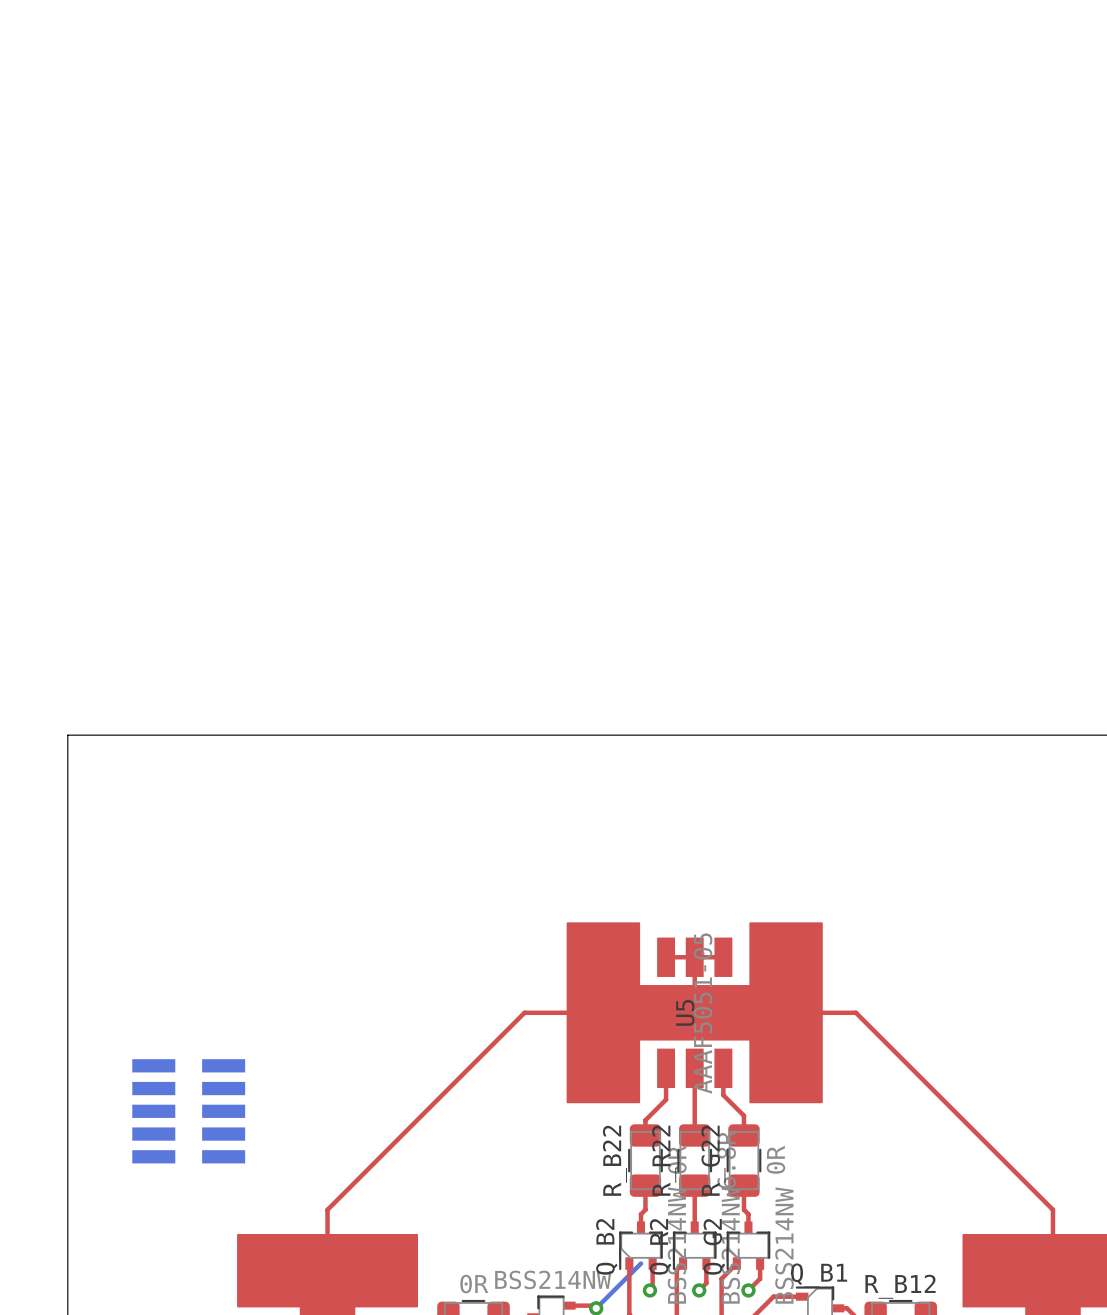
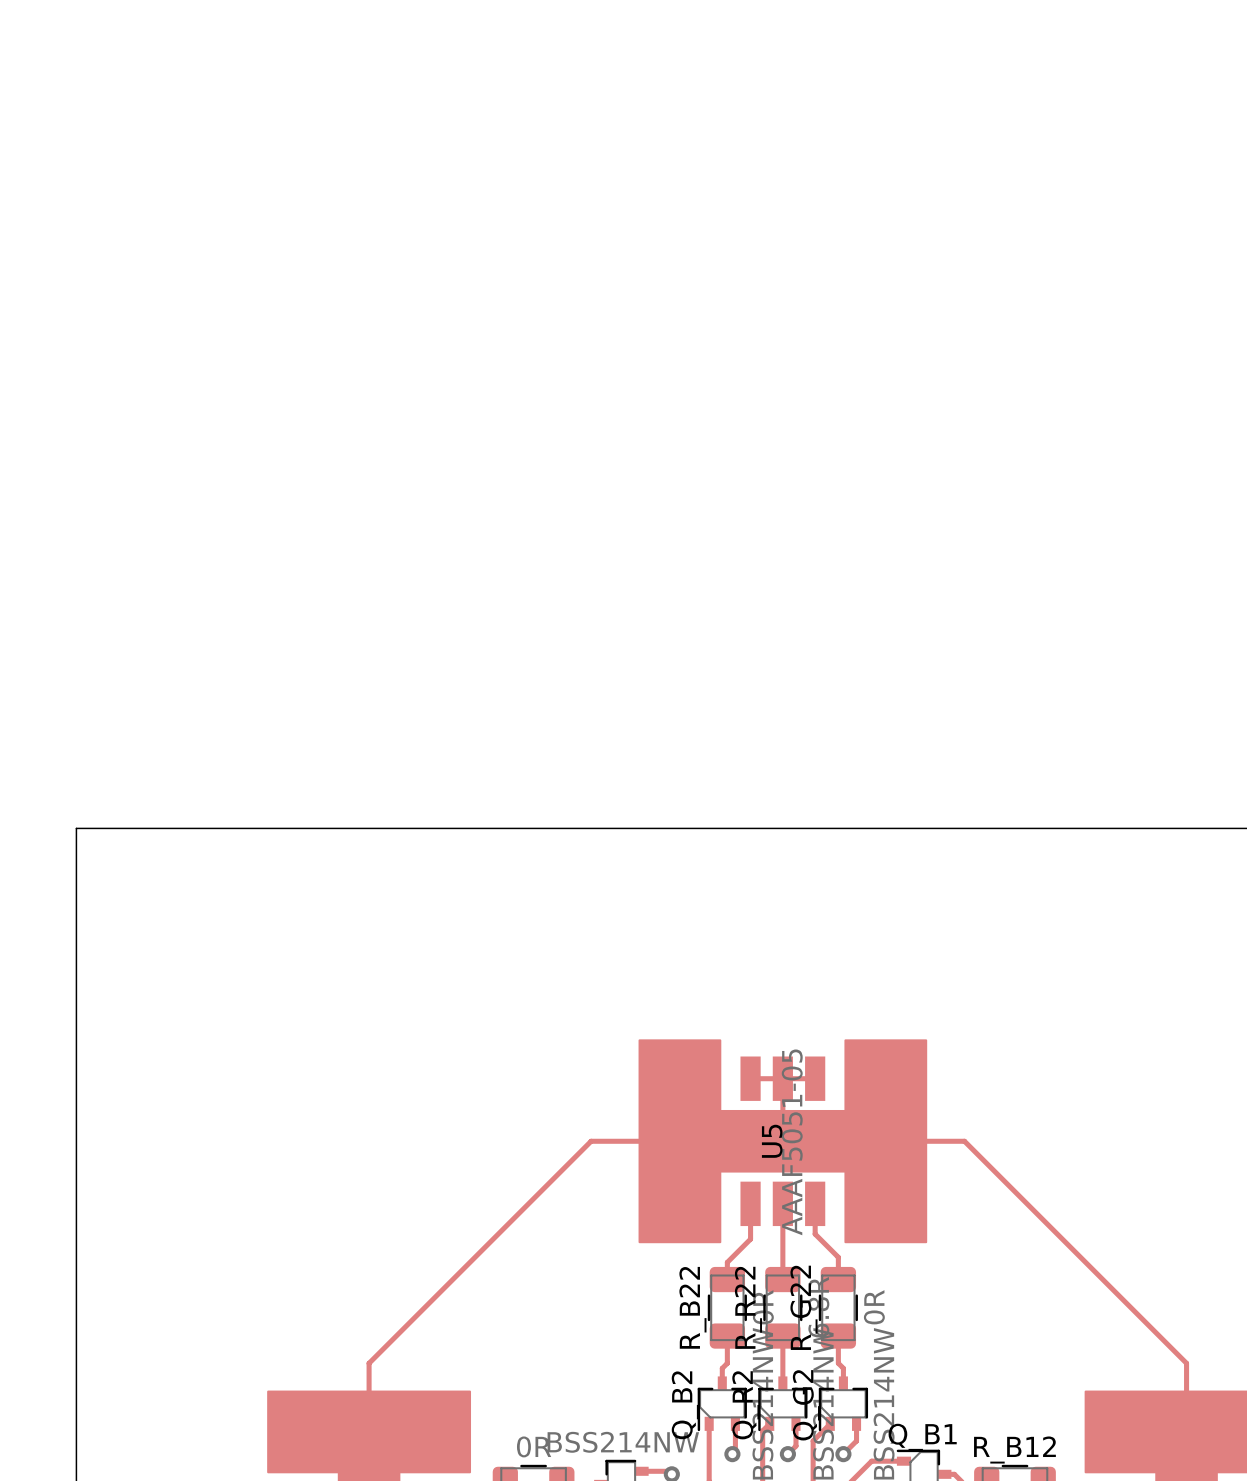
part: (188, 1111) -> none
bottom track: (640, 1263) (596, 1308) -> none

